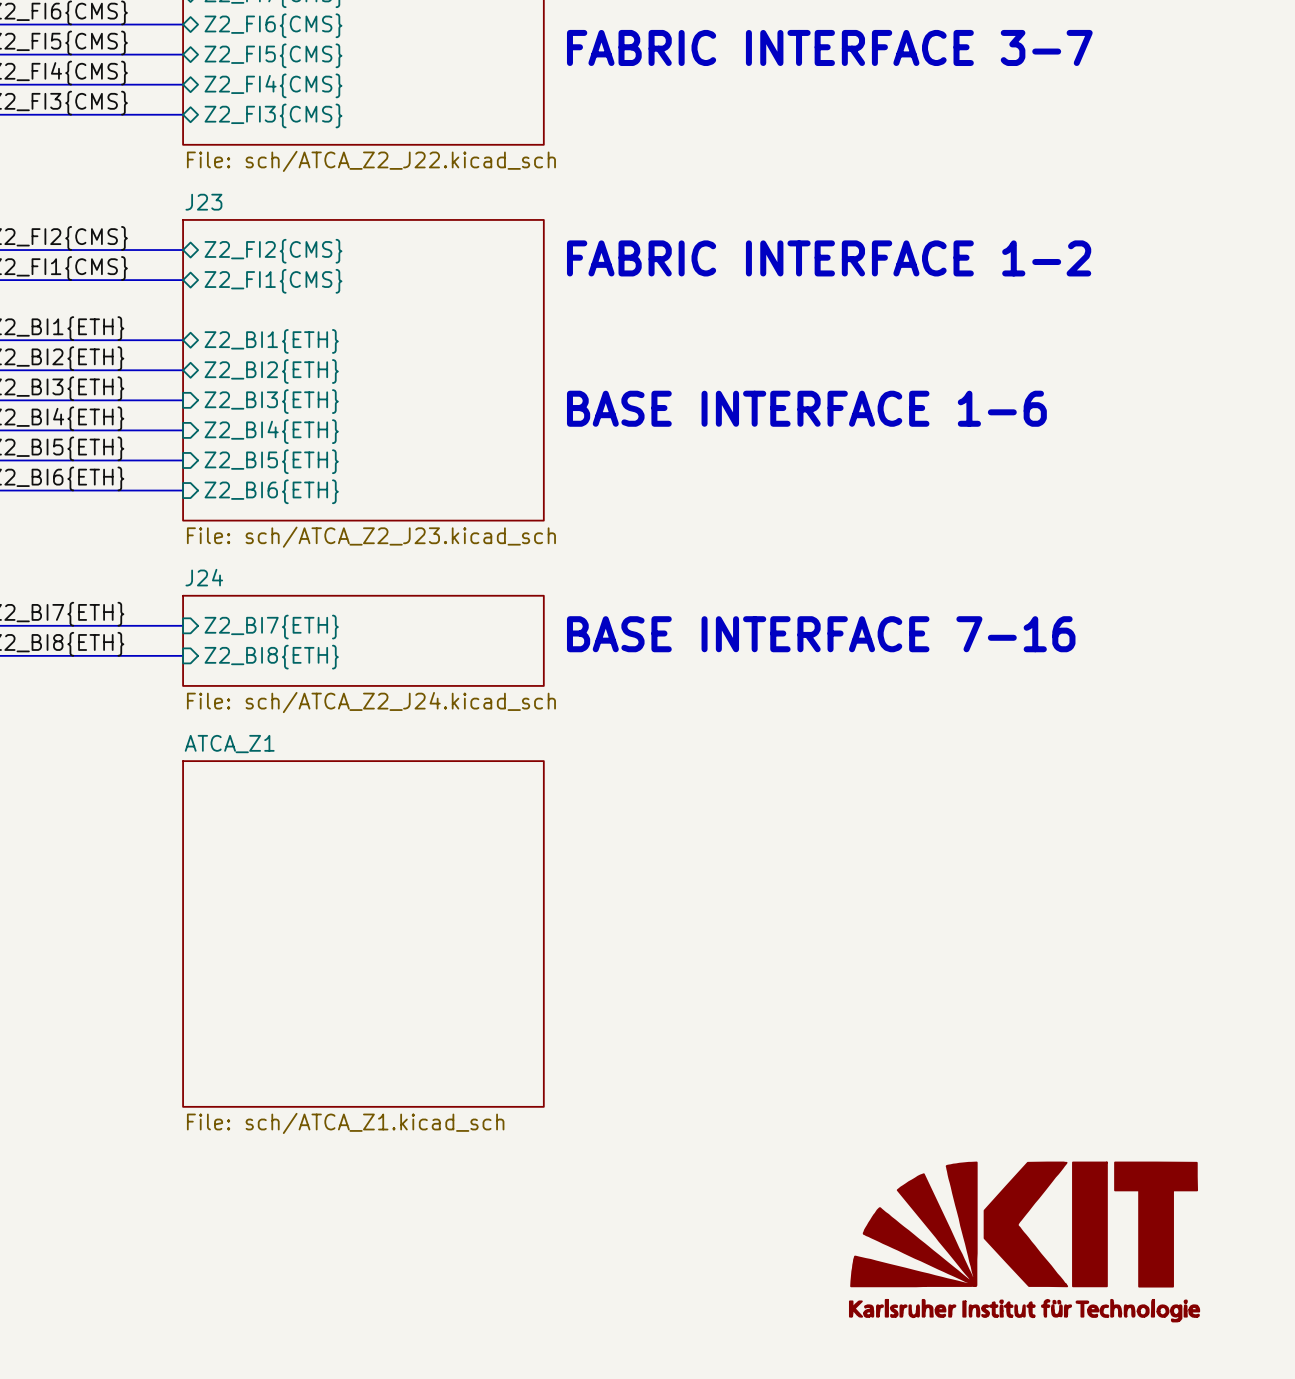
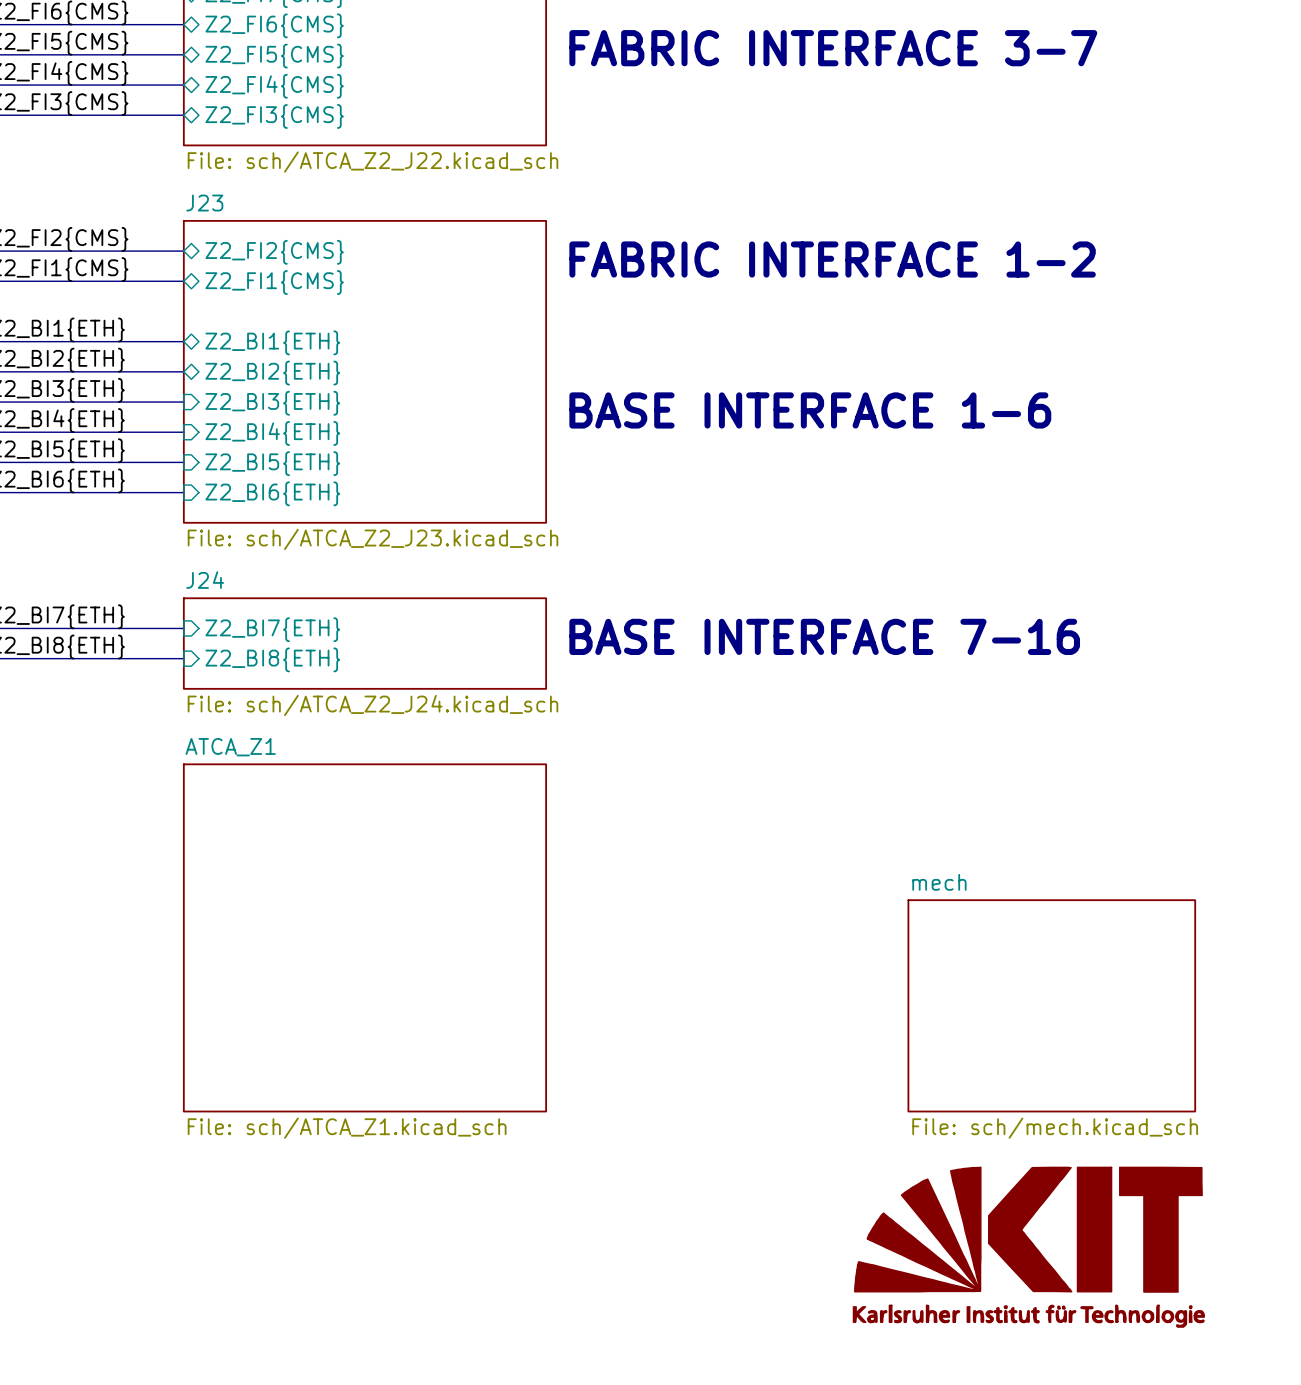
sheet mech: none -> File: sch/mech.kicad_sch (1051, 1005)

